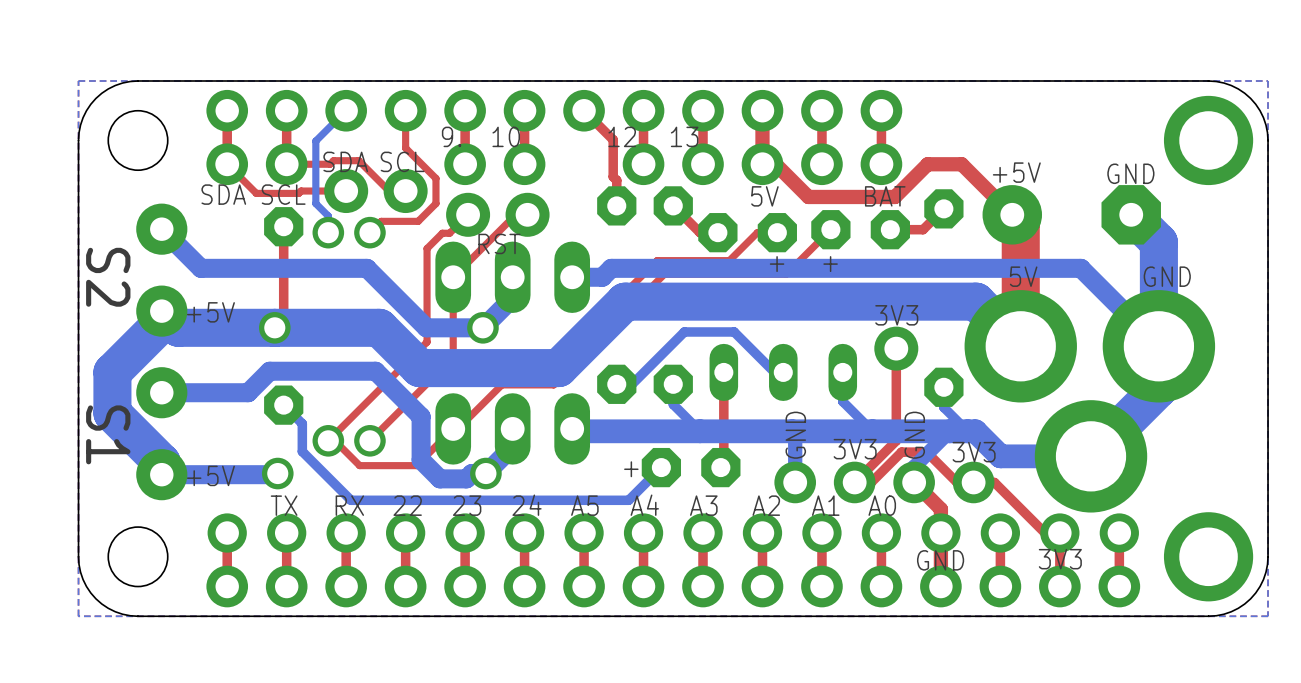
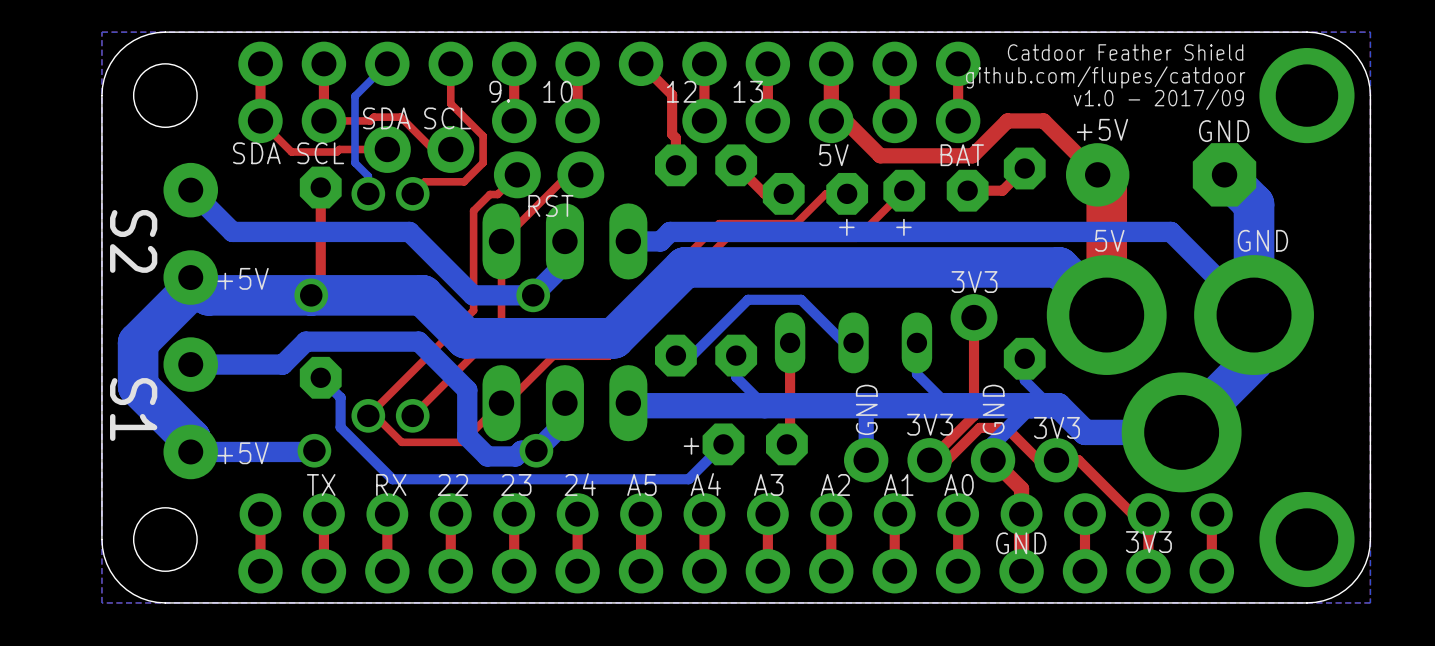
text: none -> Catdoor Feather Shield (1125, 52)
text: none -> github.com/flupes/catdoor (1105, 77)
text: none -> v1.0 - 2017/09 (1158, 99)

